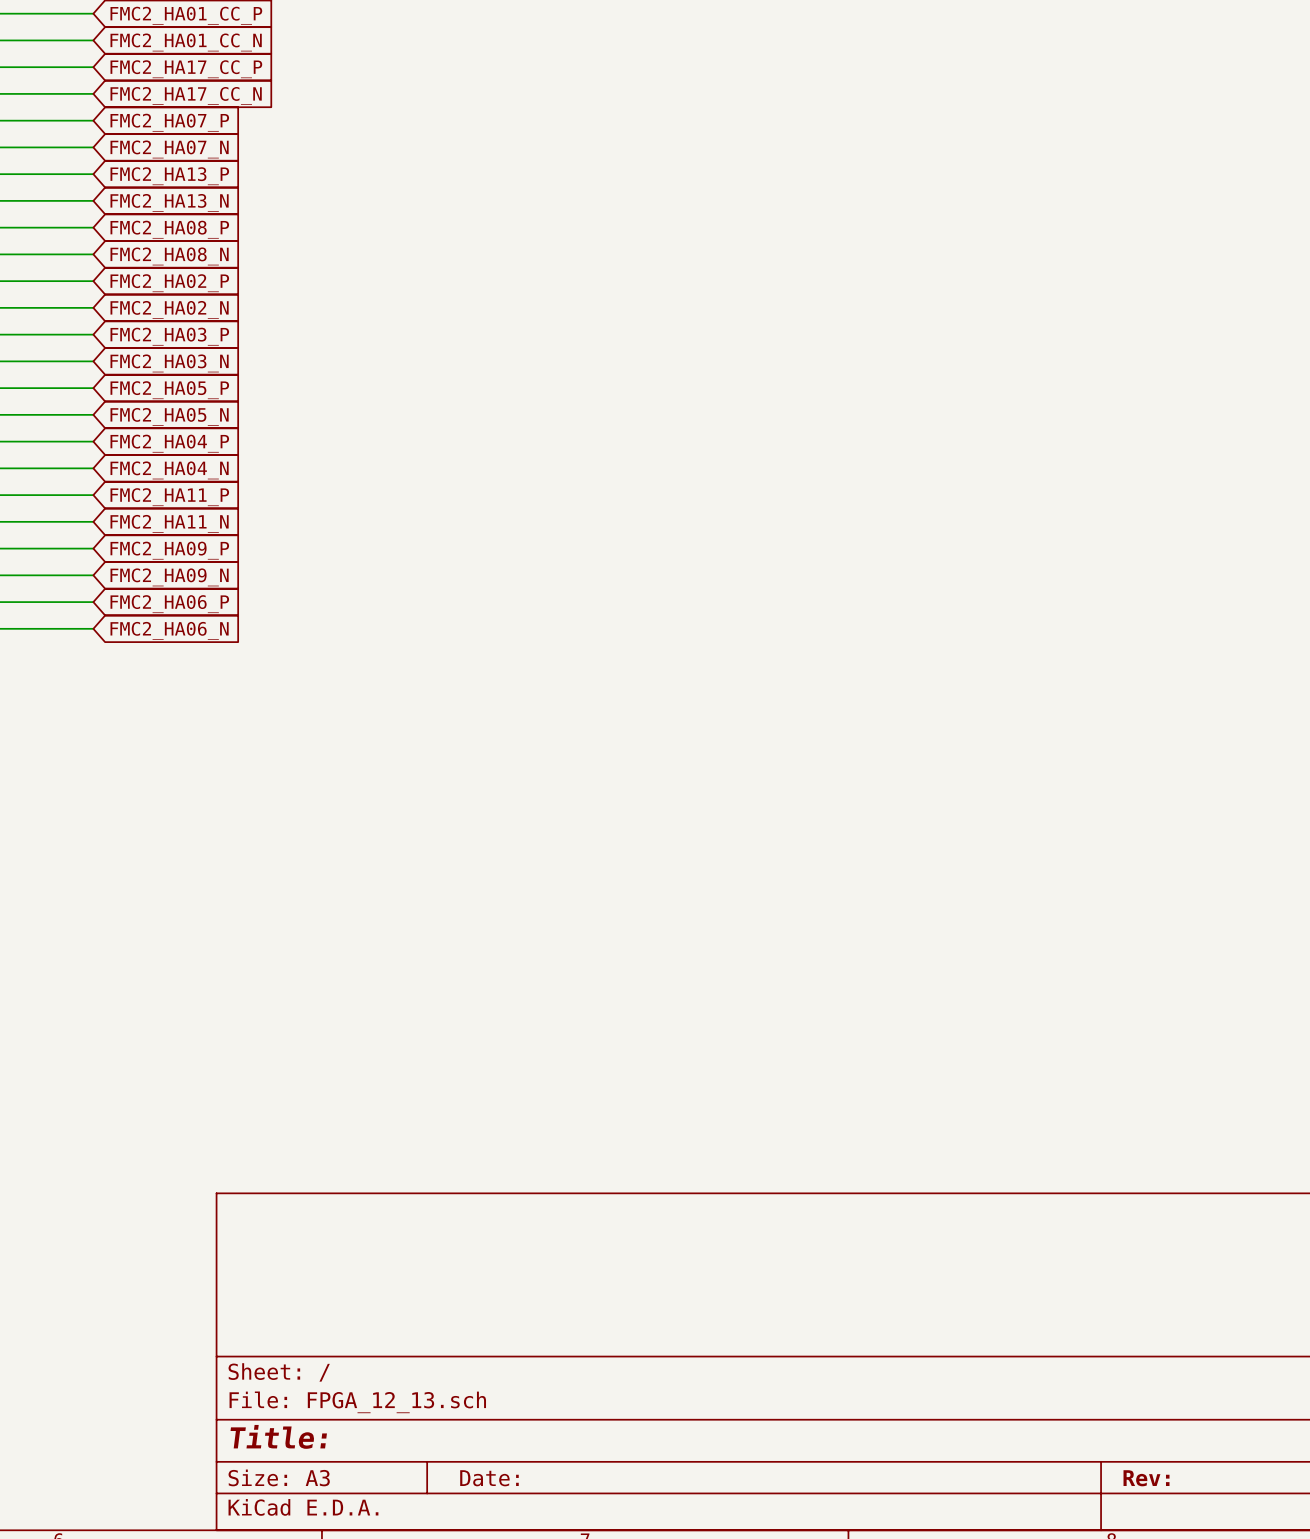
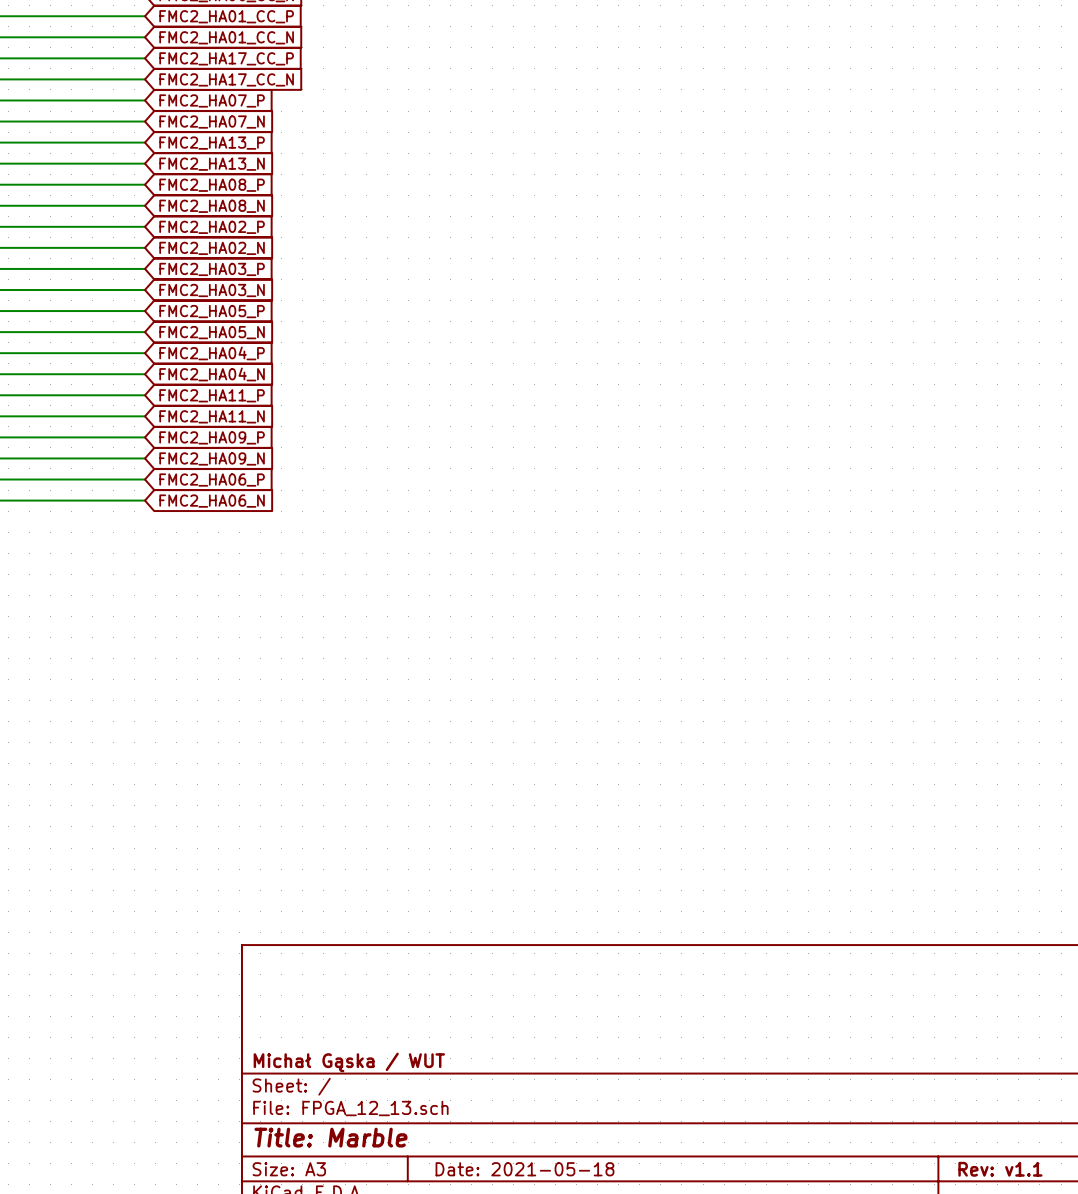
title block: none -> Michał Gąska / WUT (349, 1062)
title block: Title: (278, 1436) -> Title: Marble (331, 1137)
title block: Date: (489, 1478) -> Date: 2021-05-18 (524, 1169)
title block: Rev: (1146, 1478) -> Rev: v1.1 (1000, 1169)

